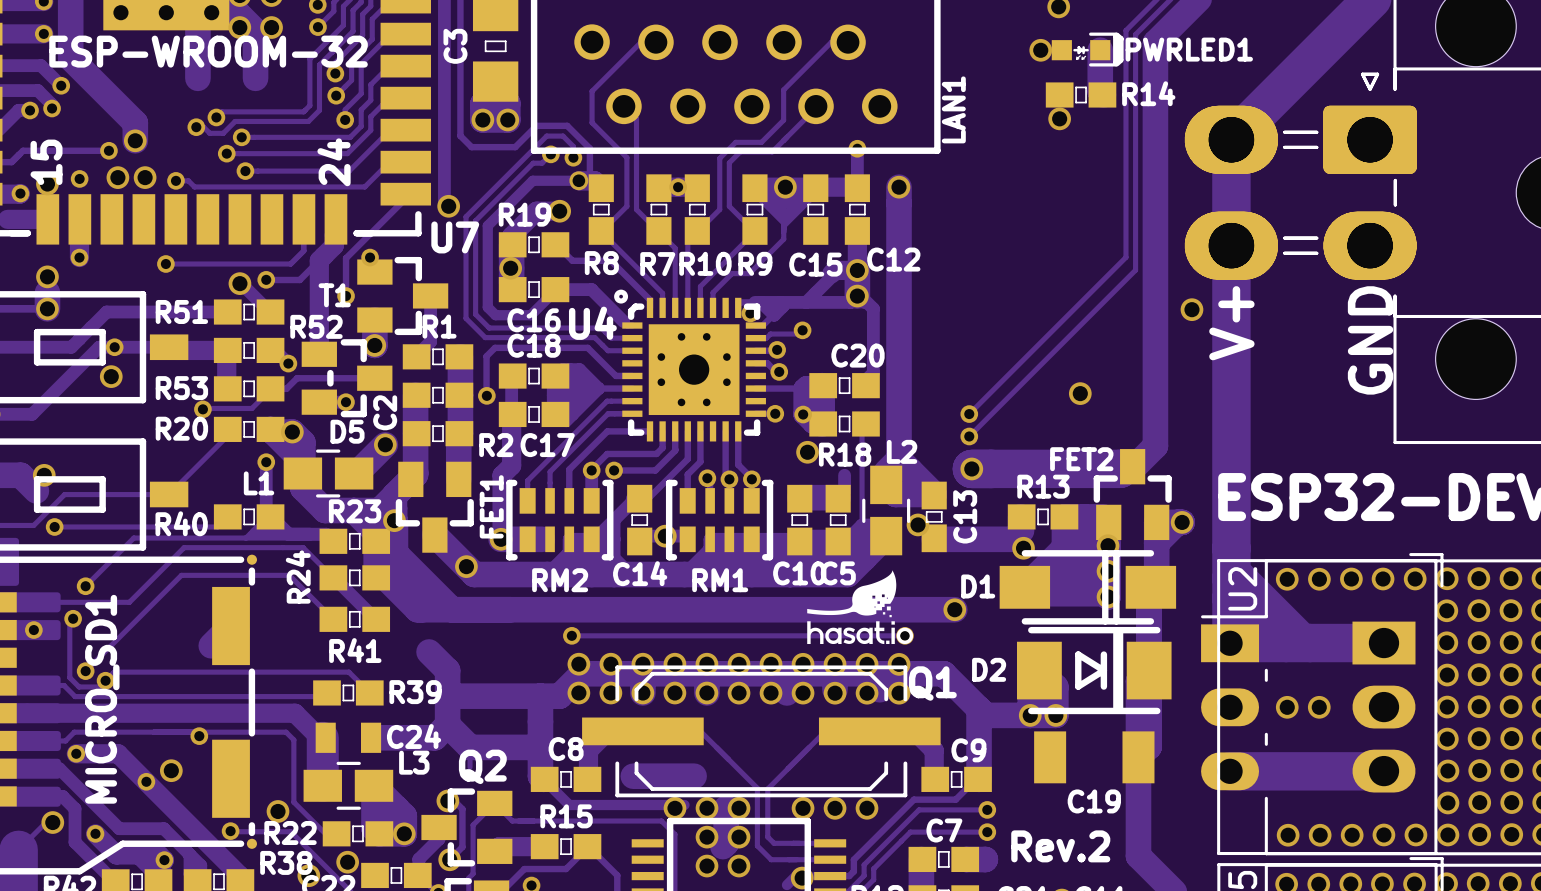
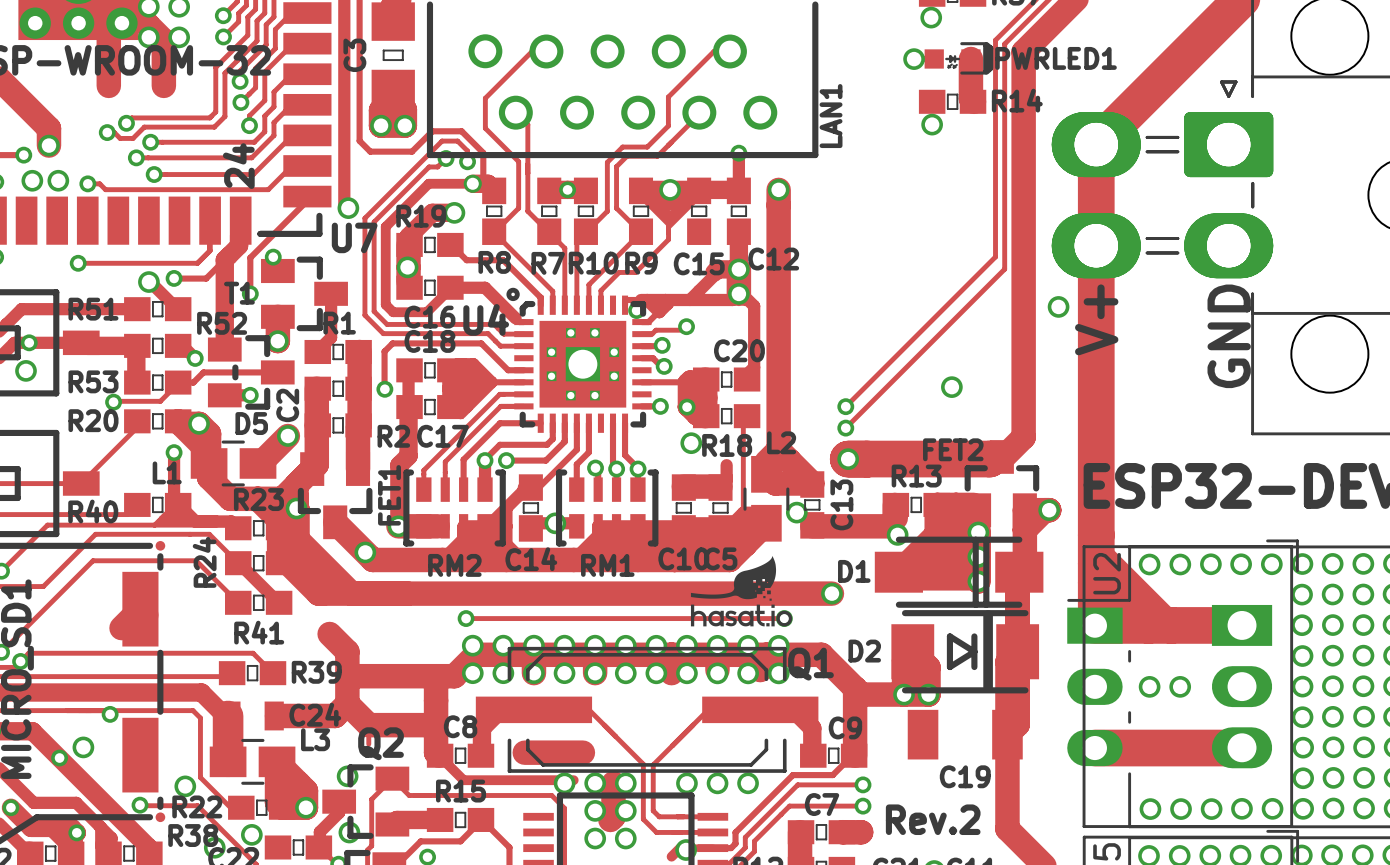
track: (447, 800) (454, 800) (462, 809) (462, 847) (449, 859) -> none

